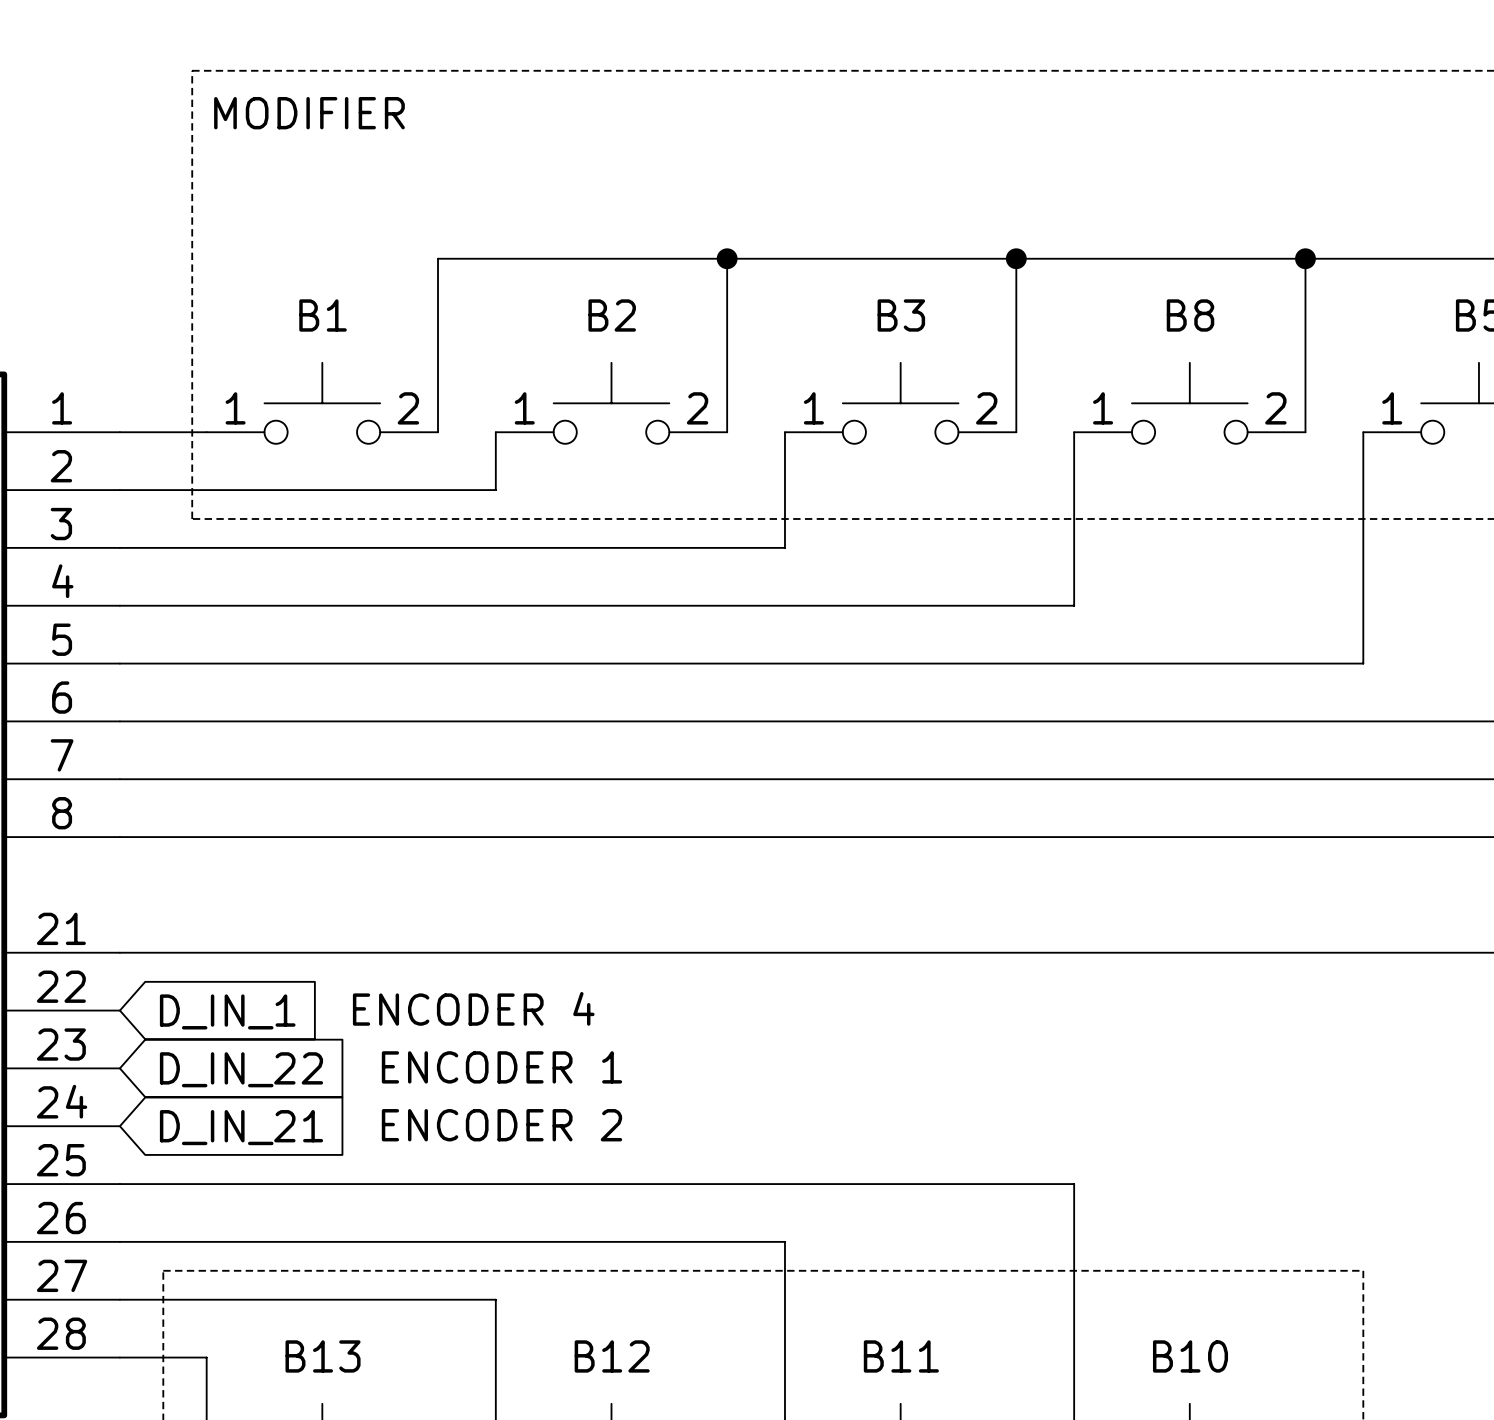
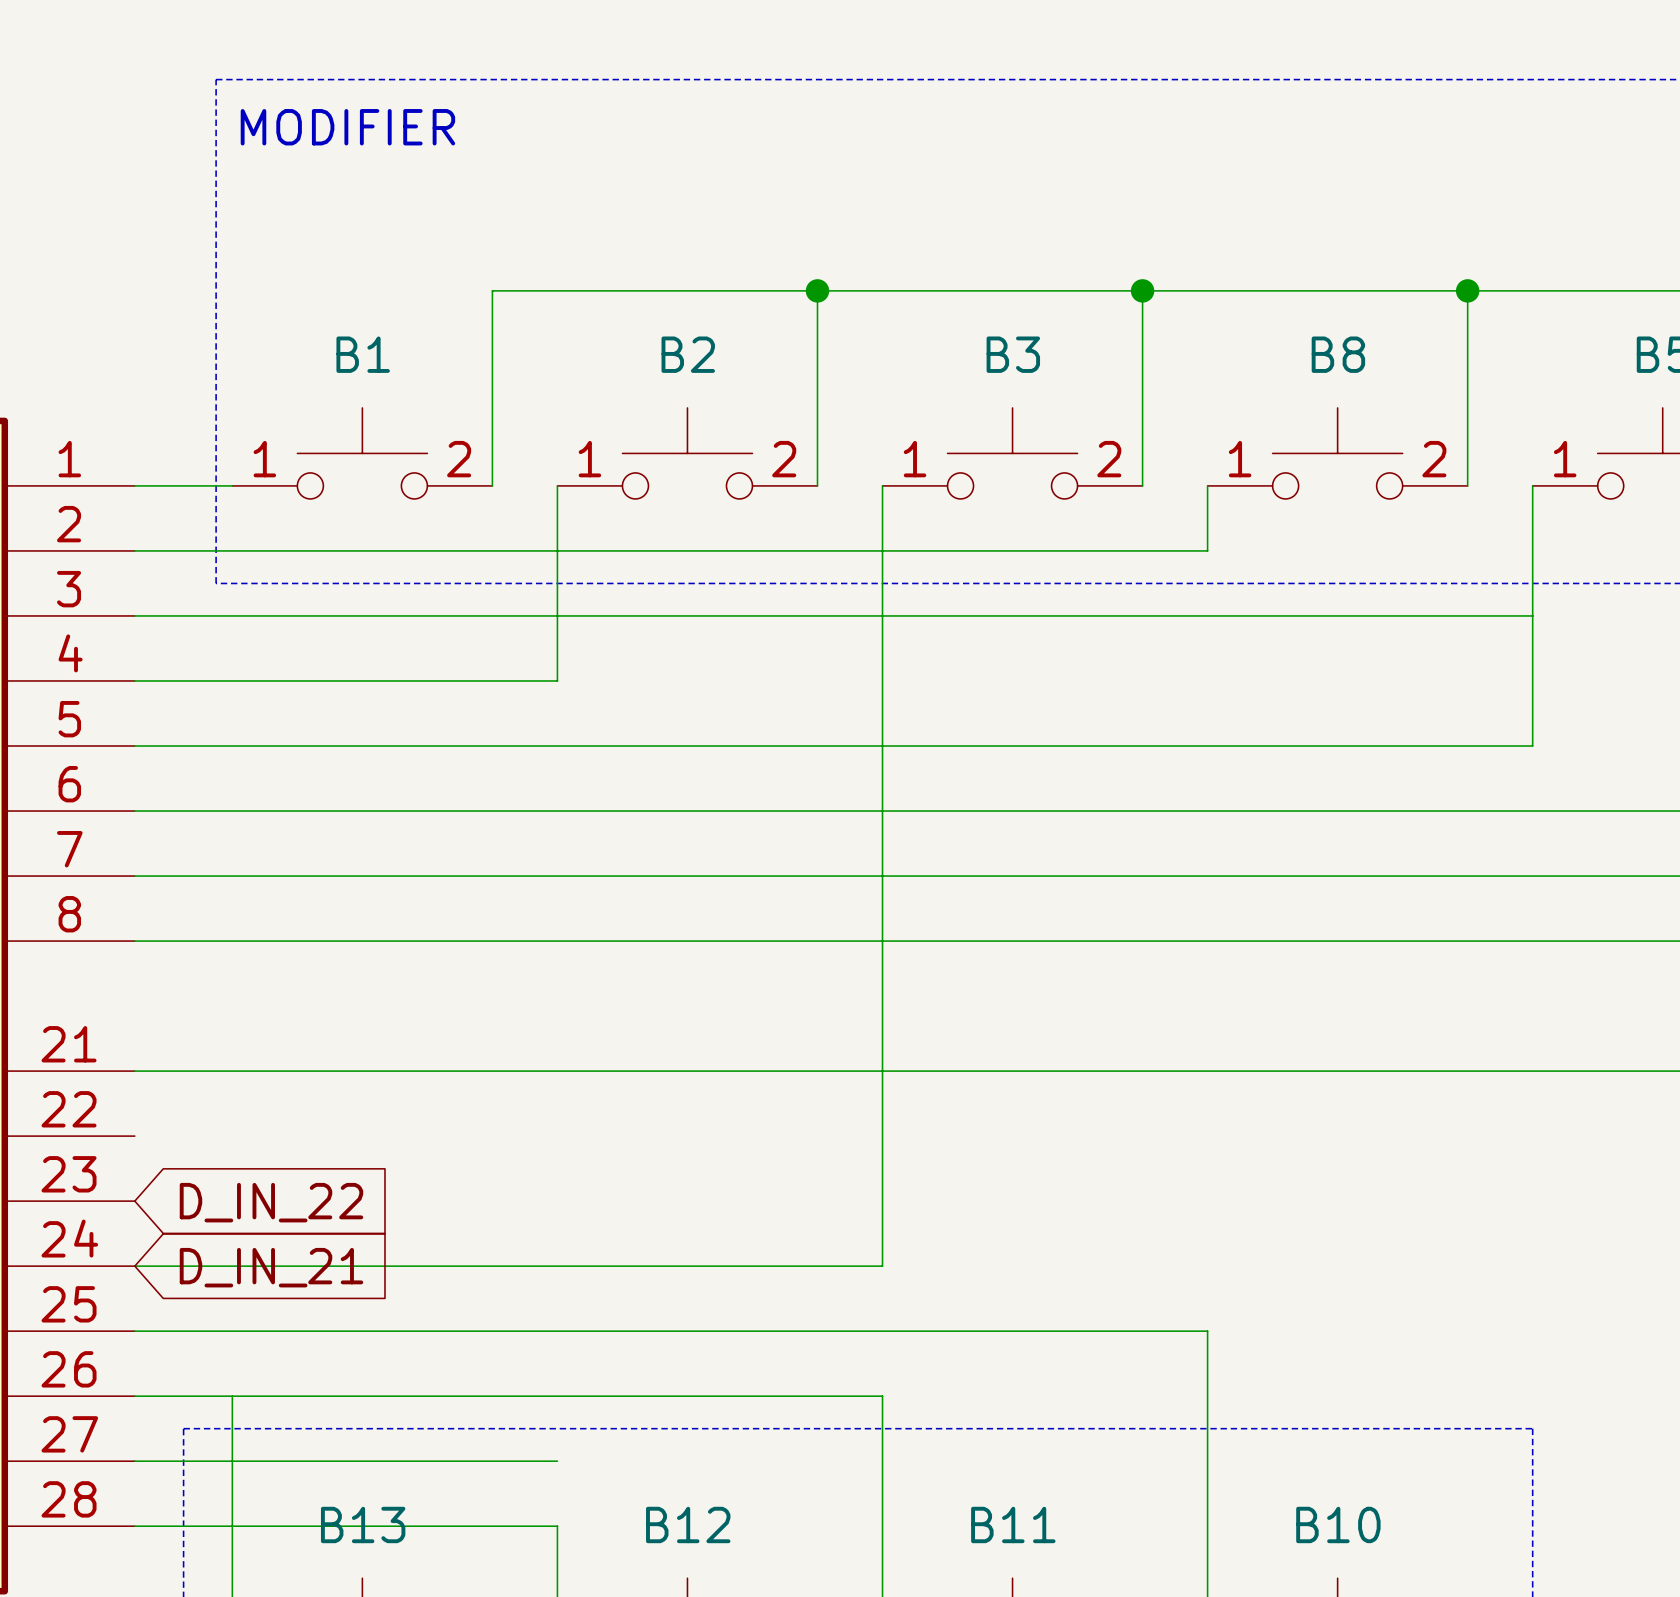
wire: (1074, 490) (1074, 605) (495, 605) -> (1207, 550) (557, 550) (557, 680)
wire: none -> (1532, 615) (882, 615) (882, 1266) (134, 1266)
text: ENCODER 4 (473, 1008) -> none
global label: D_IN_1 (227, 1011) -> none
text: ENCODER 1 (501, 1067) -> none
text: ENCODER 2 (501, 1125) -> none
wire: (495, 1299) (495, 1357) -> (232, 1396) (232, 1526) (557, 1526)

